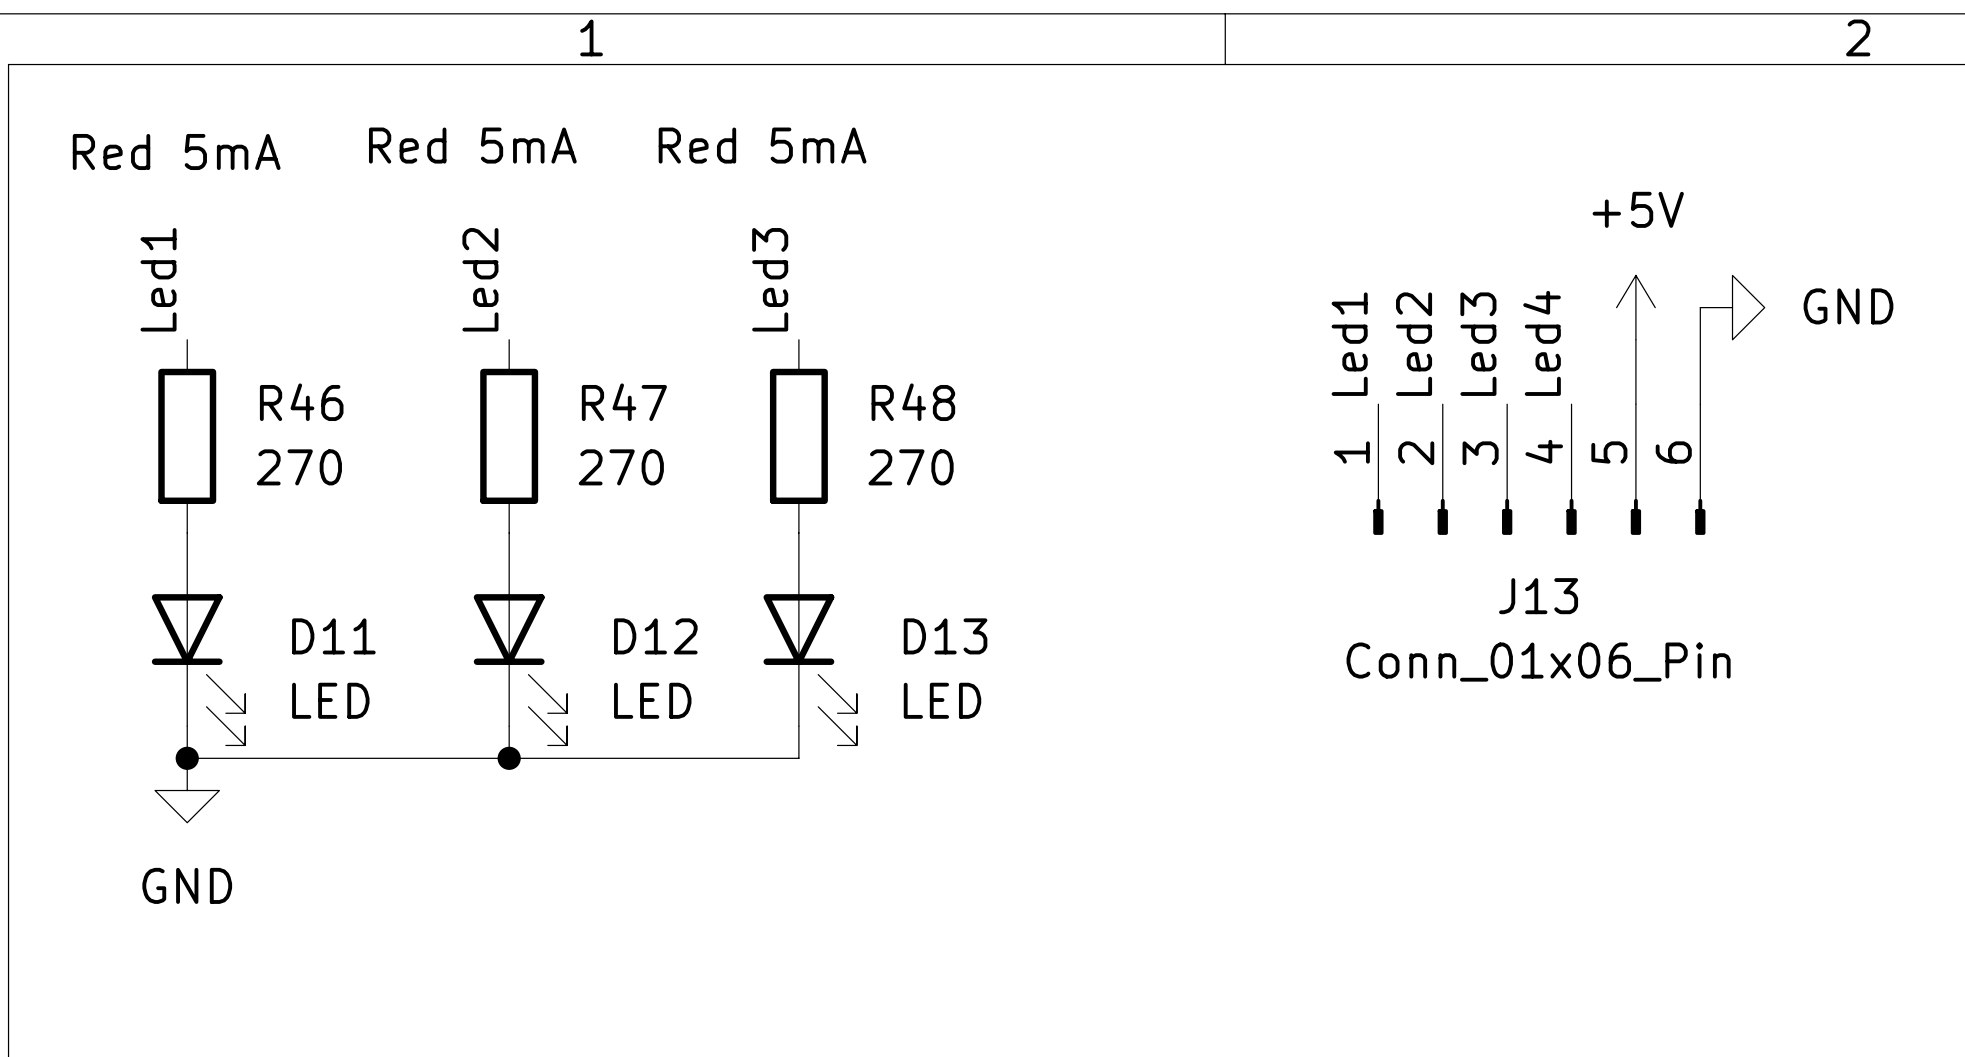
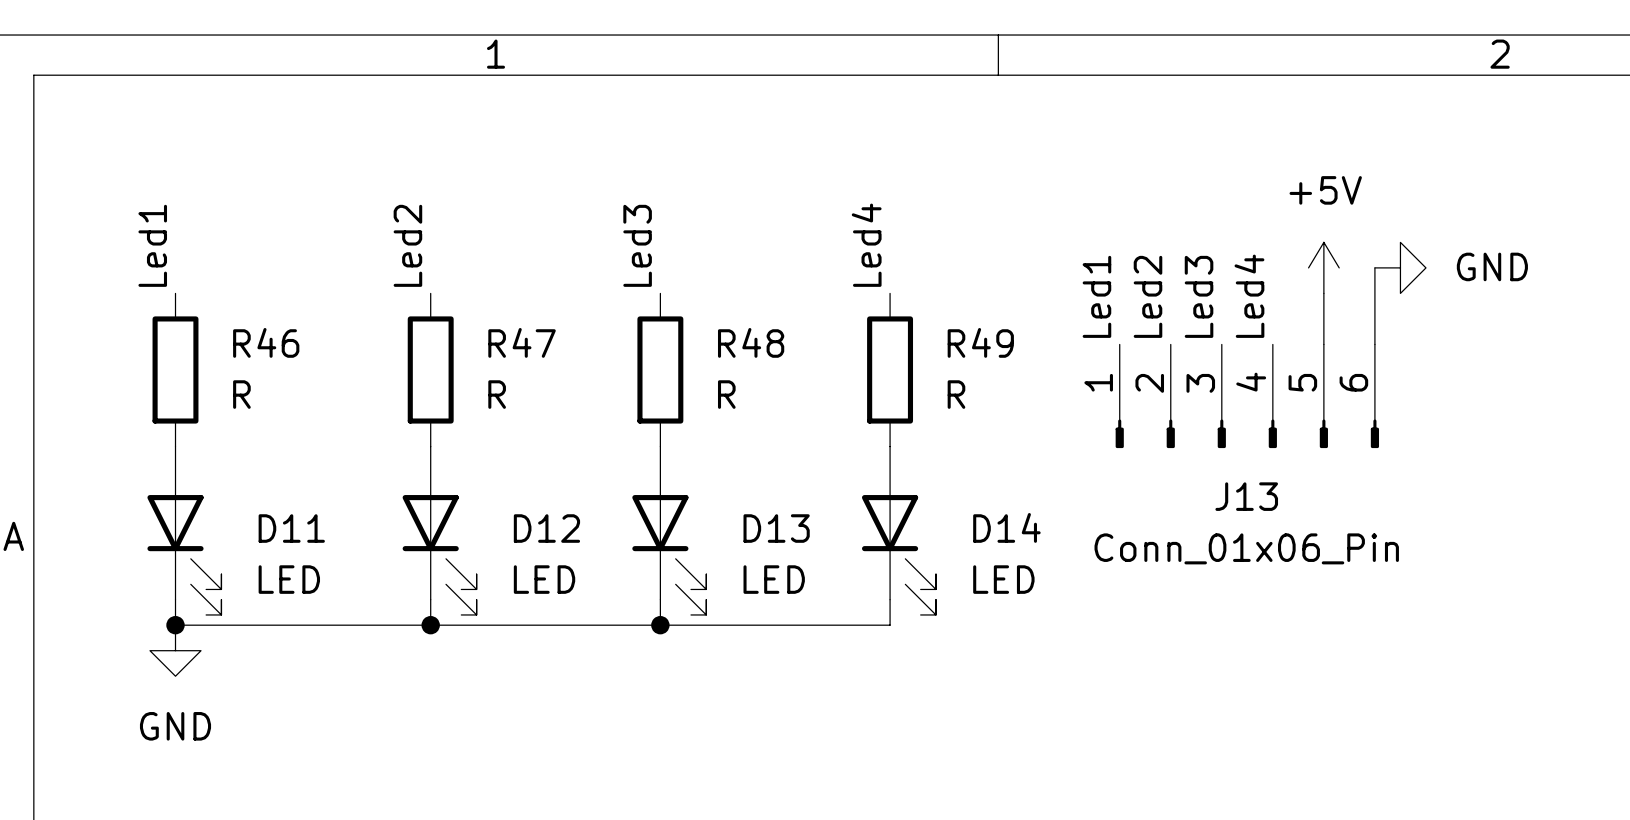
text: Red 5mA (472, 145) -> none
text: Red 5mA (762, 145) -> none
text: Red 5mA (176, 151) -> none
label: none -> Led4 (866, 245)
R49: none -> R (890, 369)
R46 value: 270 (299, 467) -> R (241, 394)
R47 value: 270 (621, 467) -> R (497, 394)
R48 value: 270 (911, 467) -> R (726, 394)
D14: none -> LED (898, 530)
wire: none -> (890, 599) (890, 625) (660, 625)
junction: none -> (660, 625)

